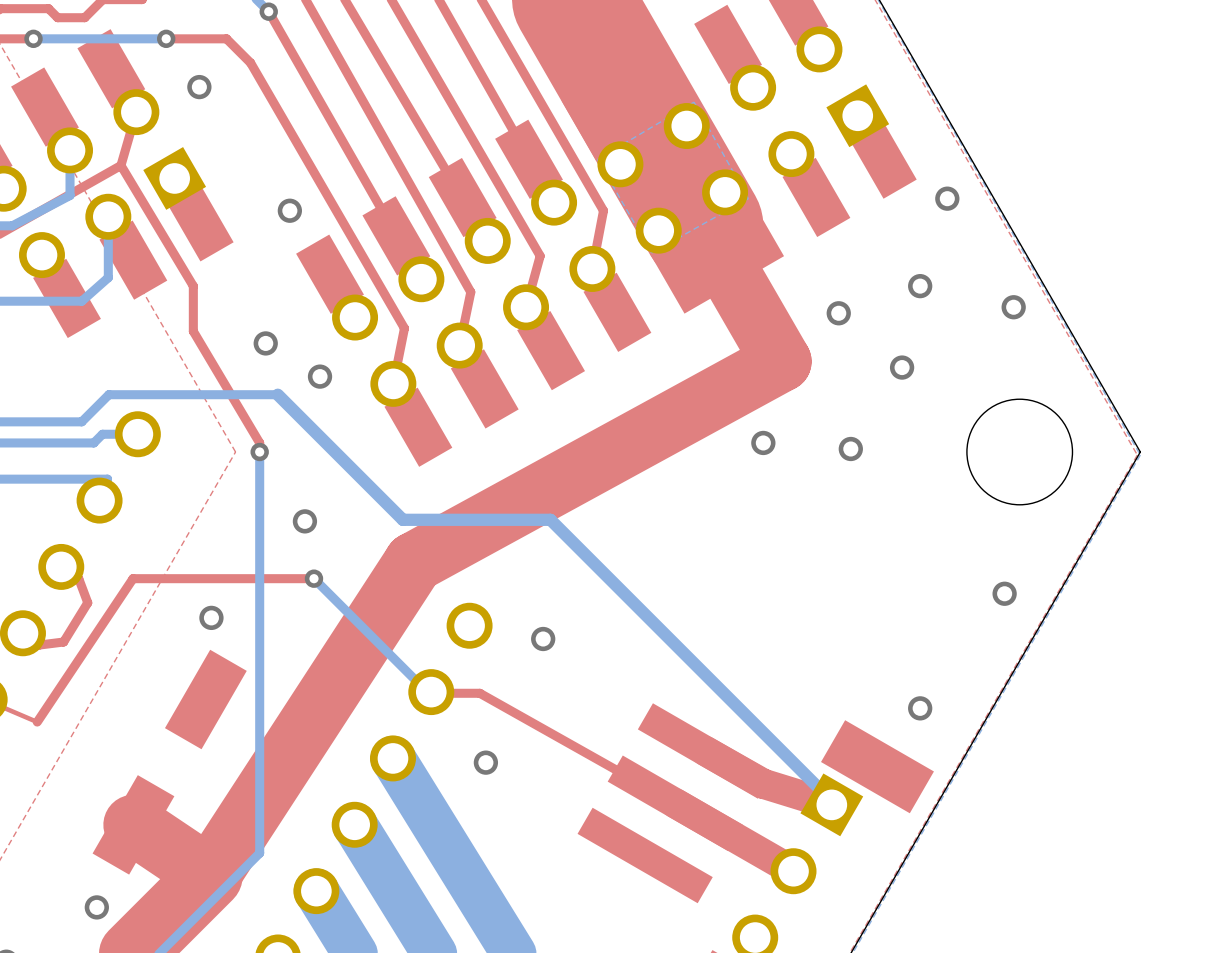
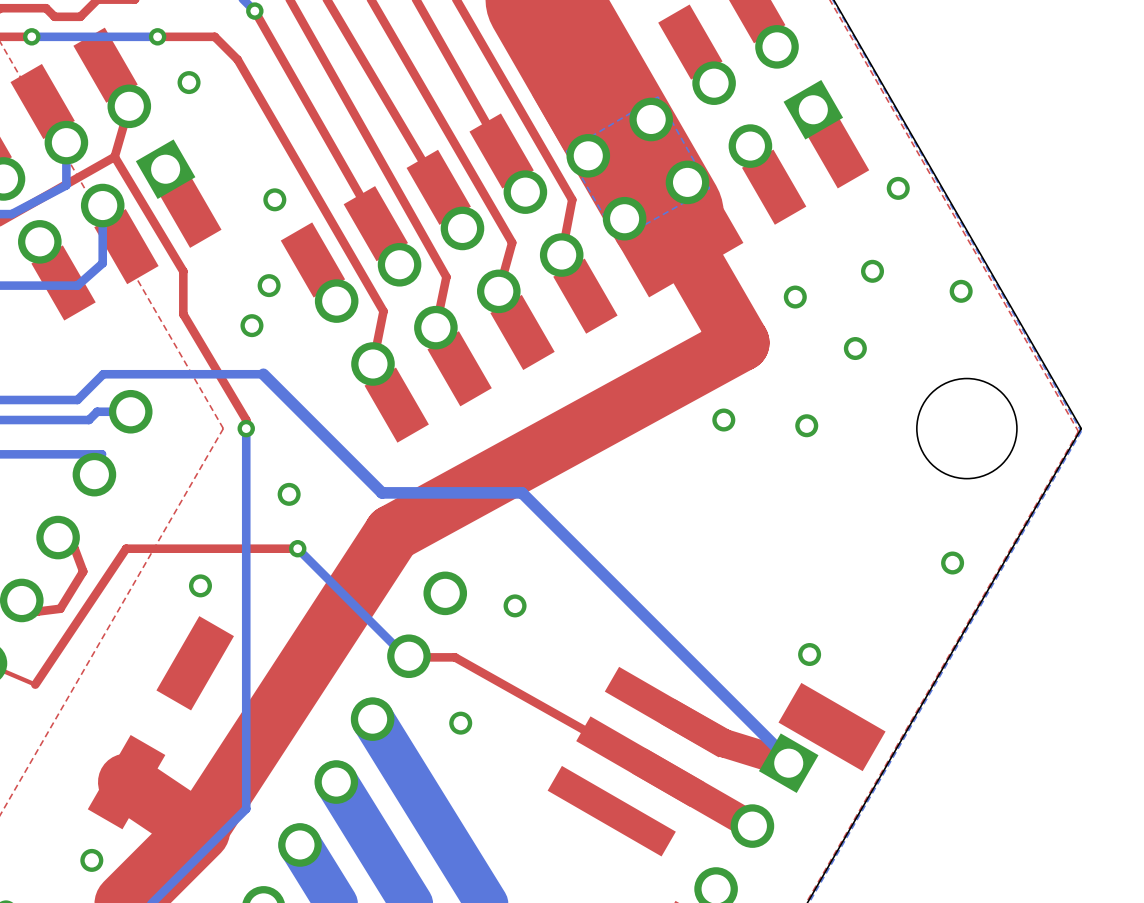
via position: (320, 376) -> (269, 285)
via position: (920, 708) -> (809, 654)

